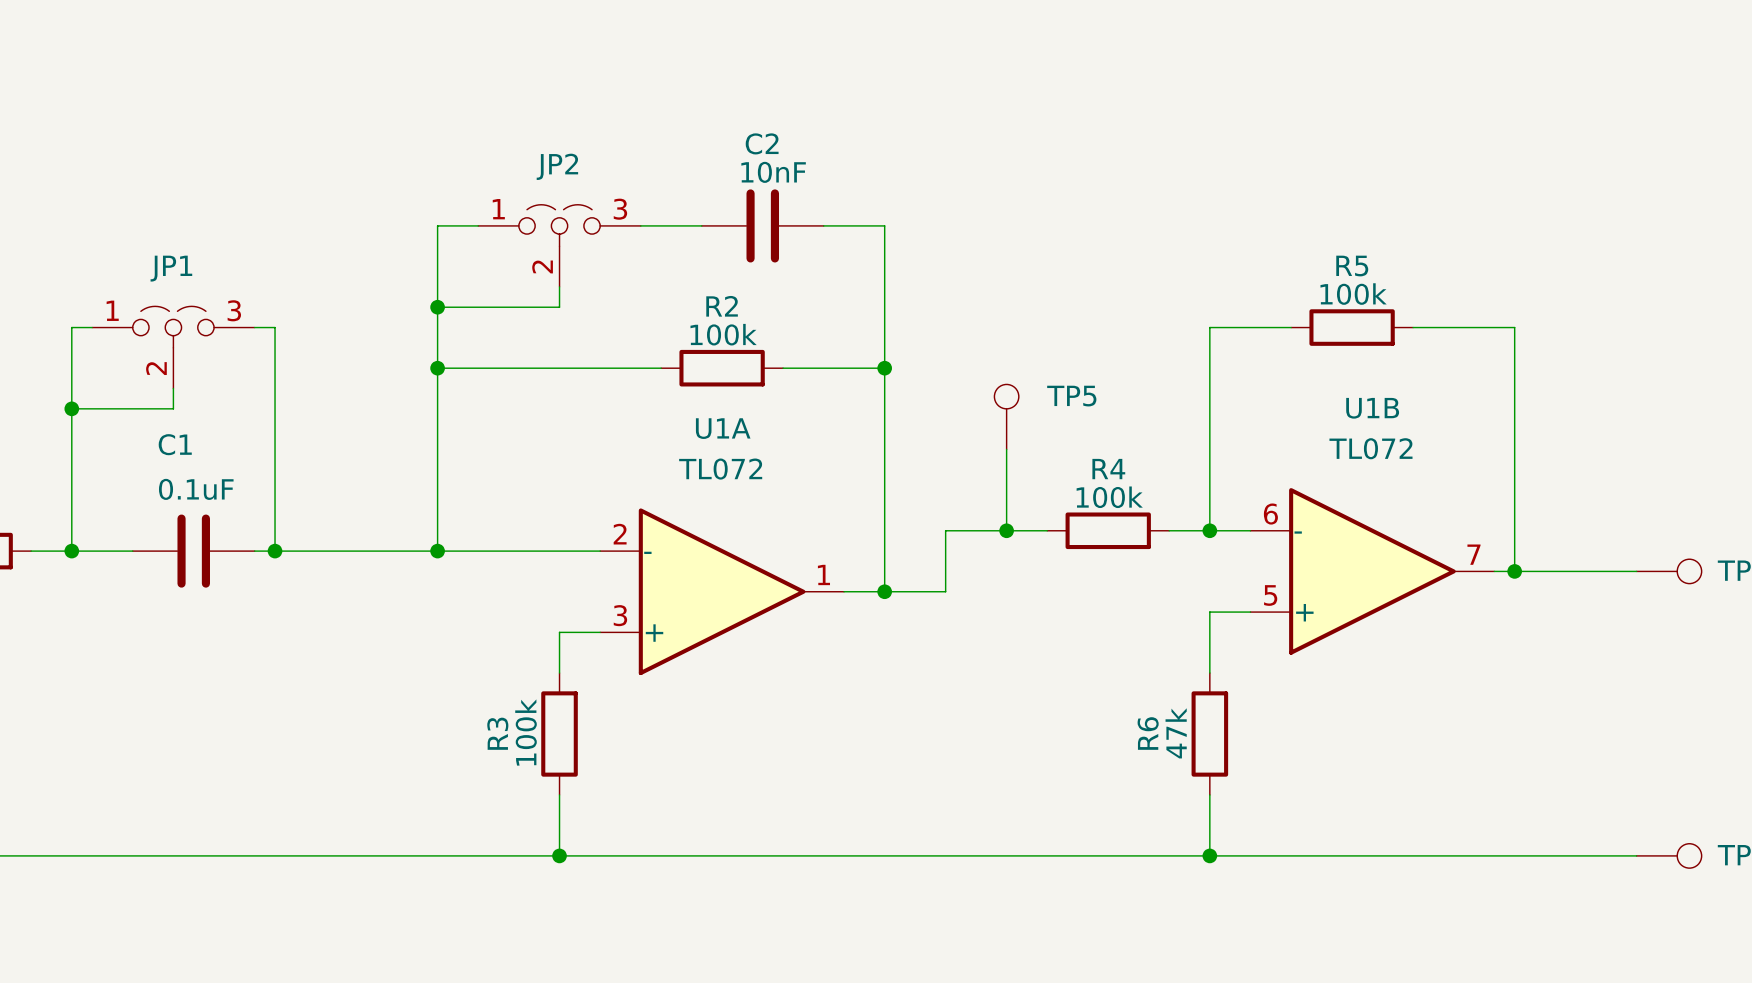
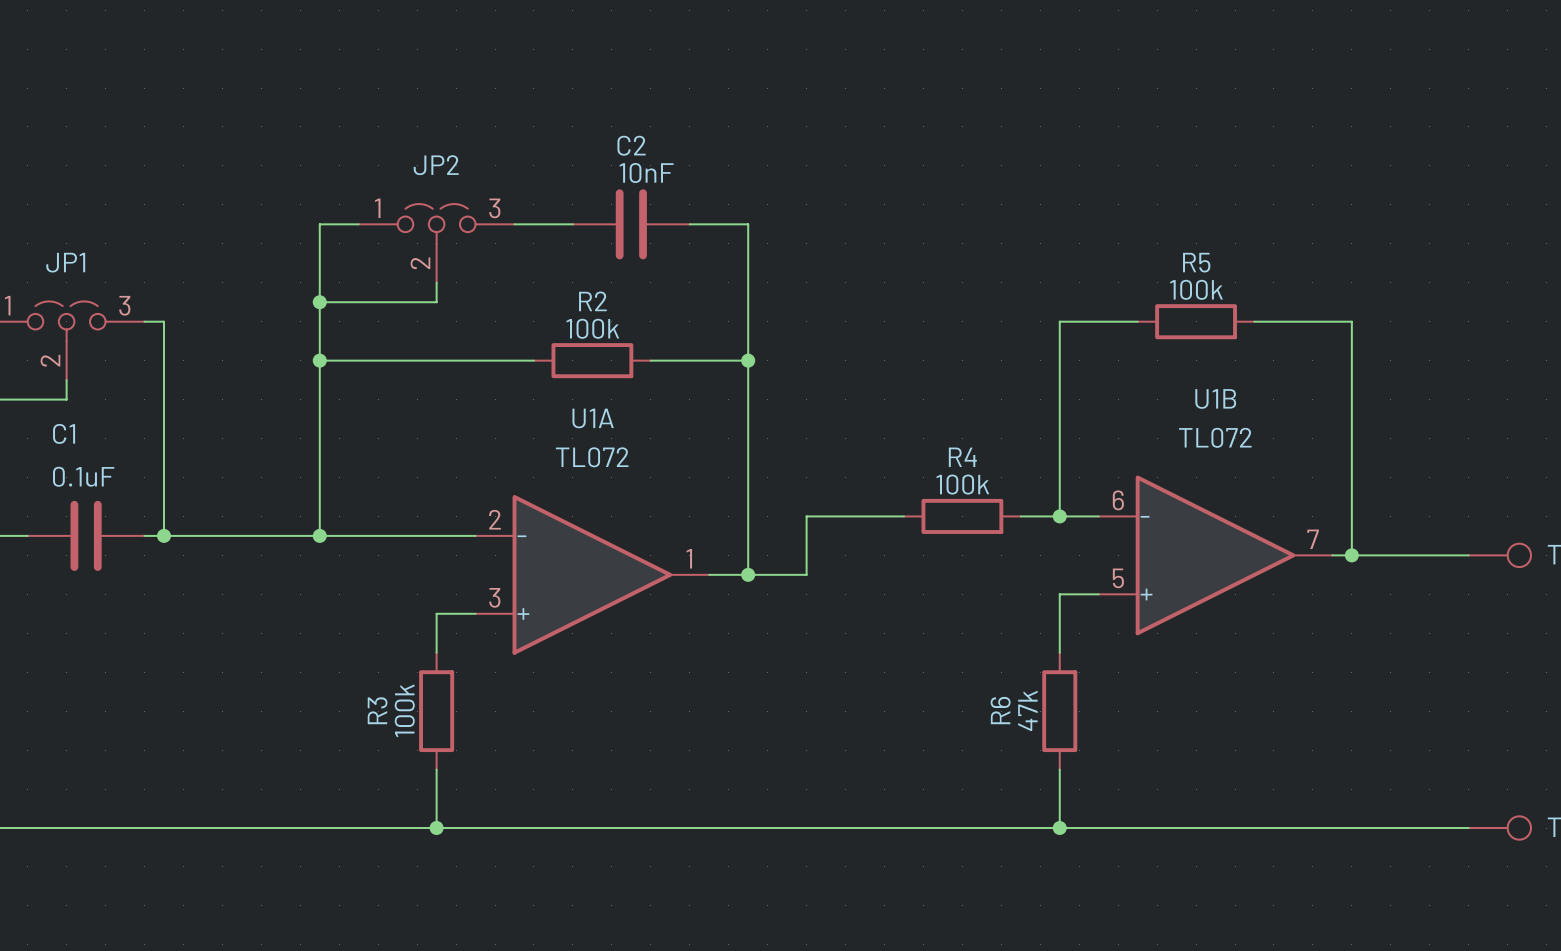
TP5: (1006, 416) -> none
wire: (1006, 449) (1006, 530) -> none
junction: (1006, 530) -> none

